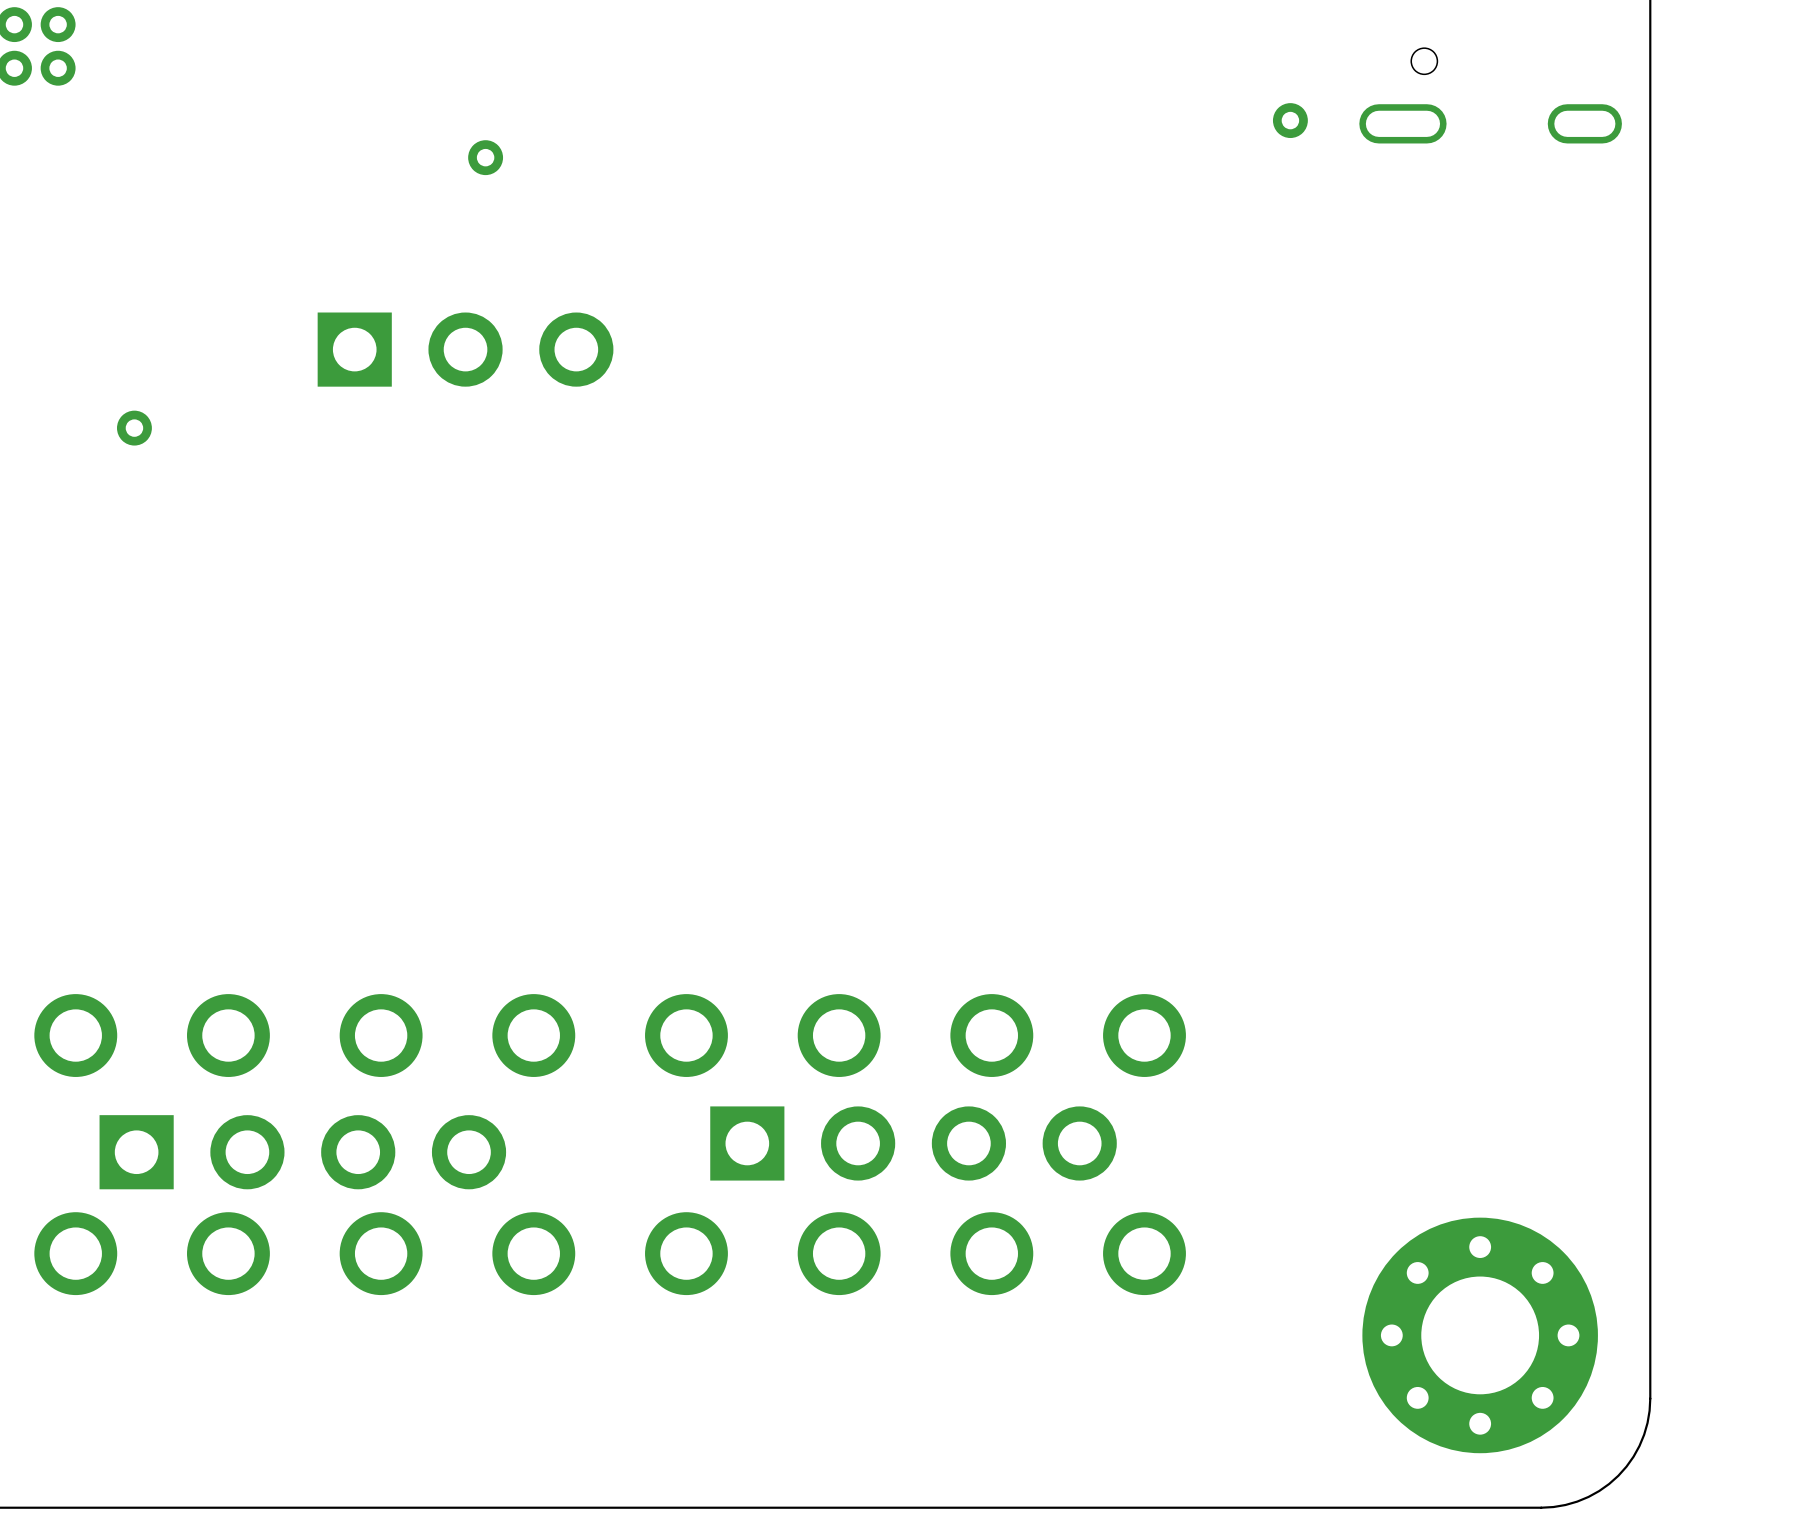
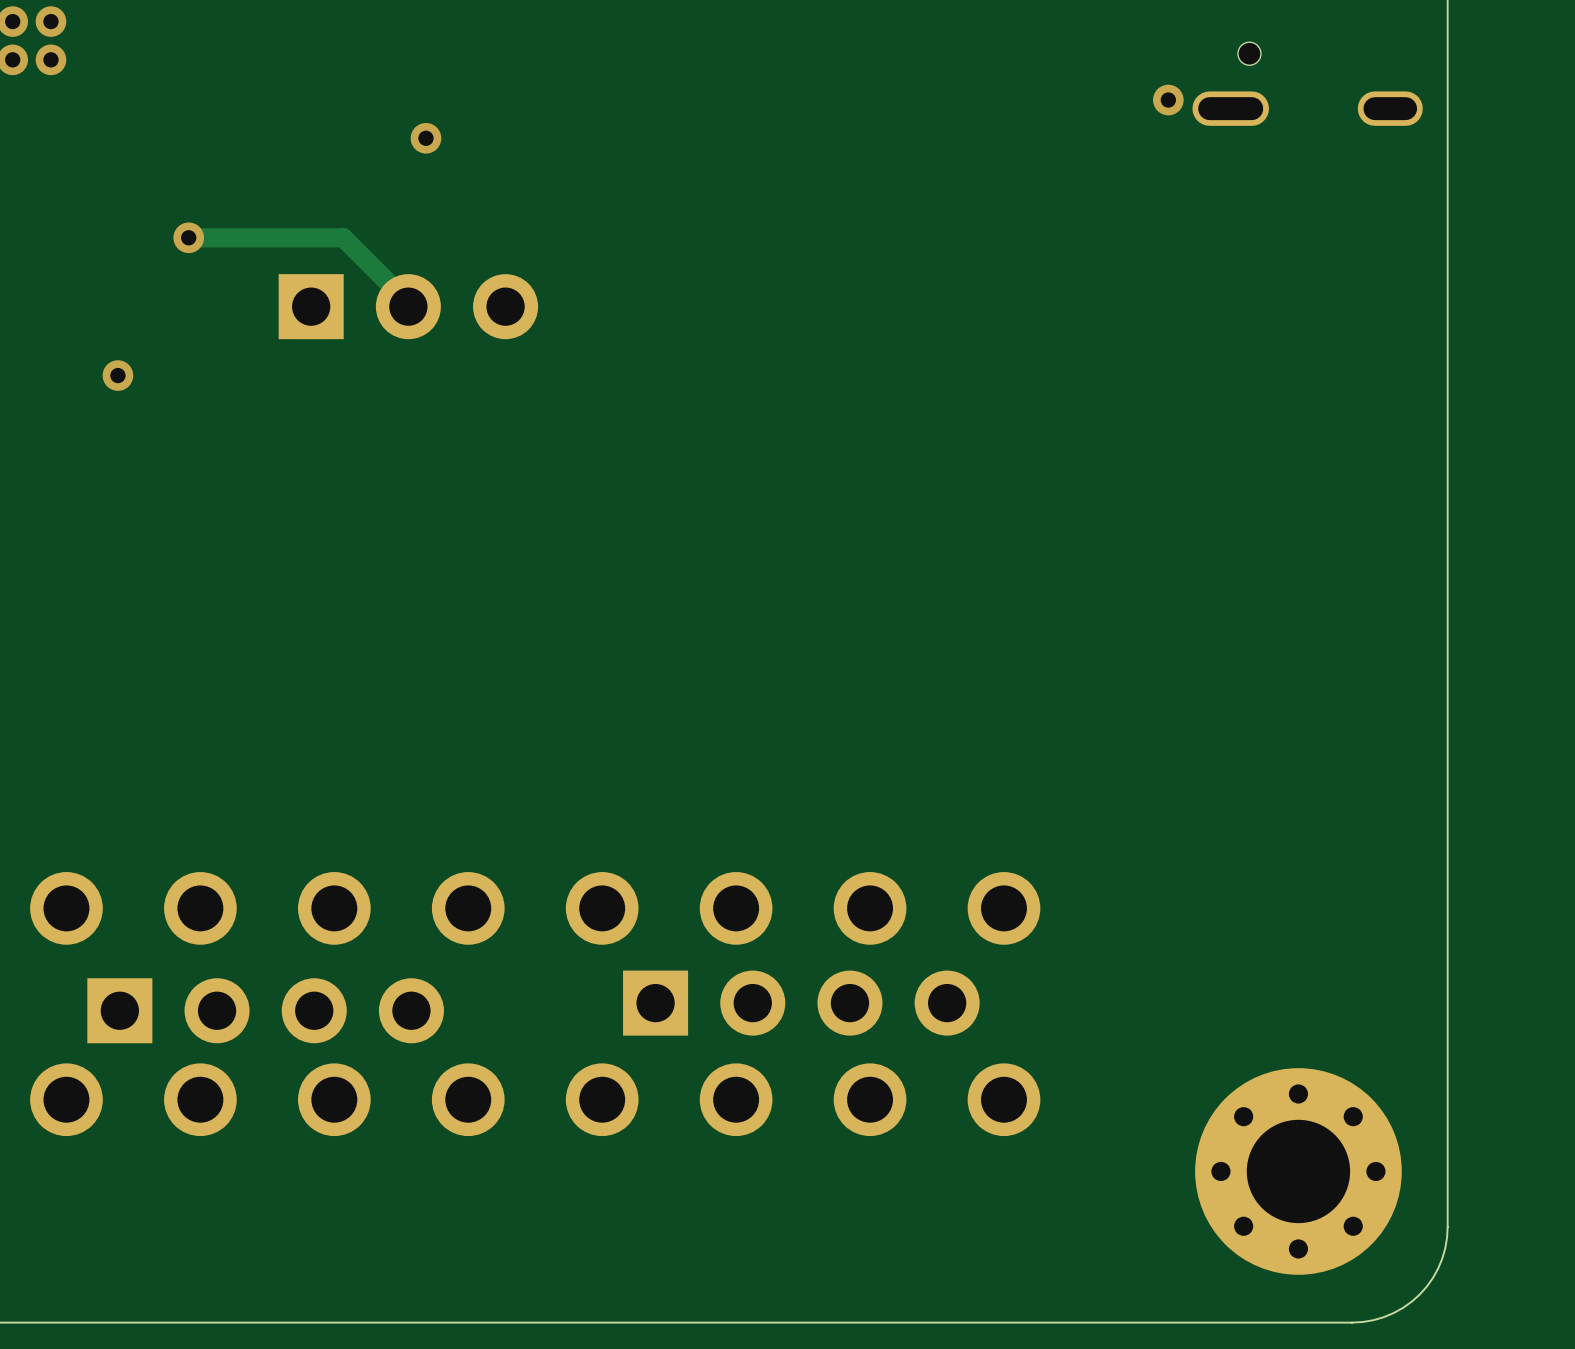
via position: (1290, 120) -> (1168, 100)
track: none -> (188, 237) (343, 237) (412, 306)
via: none -> (188, 237)

